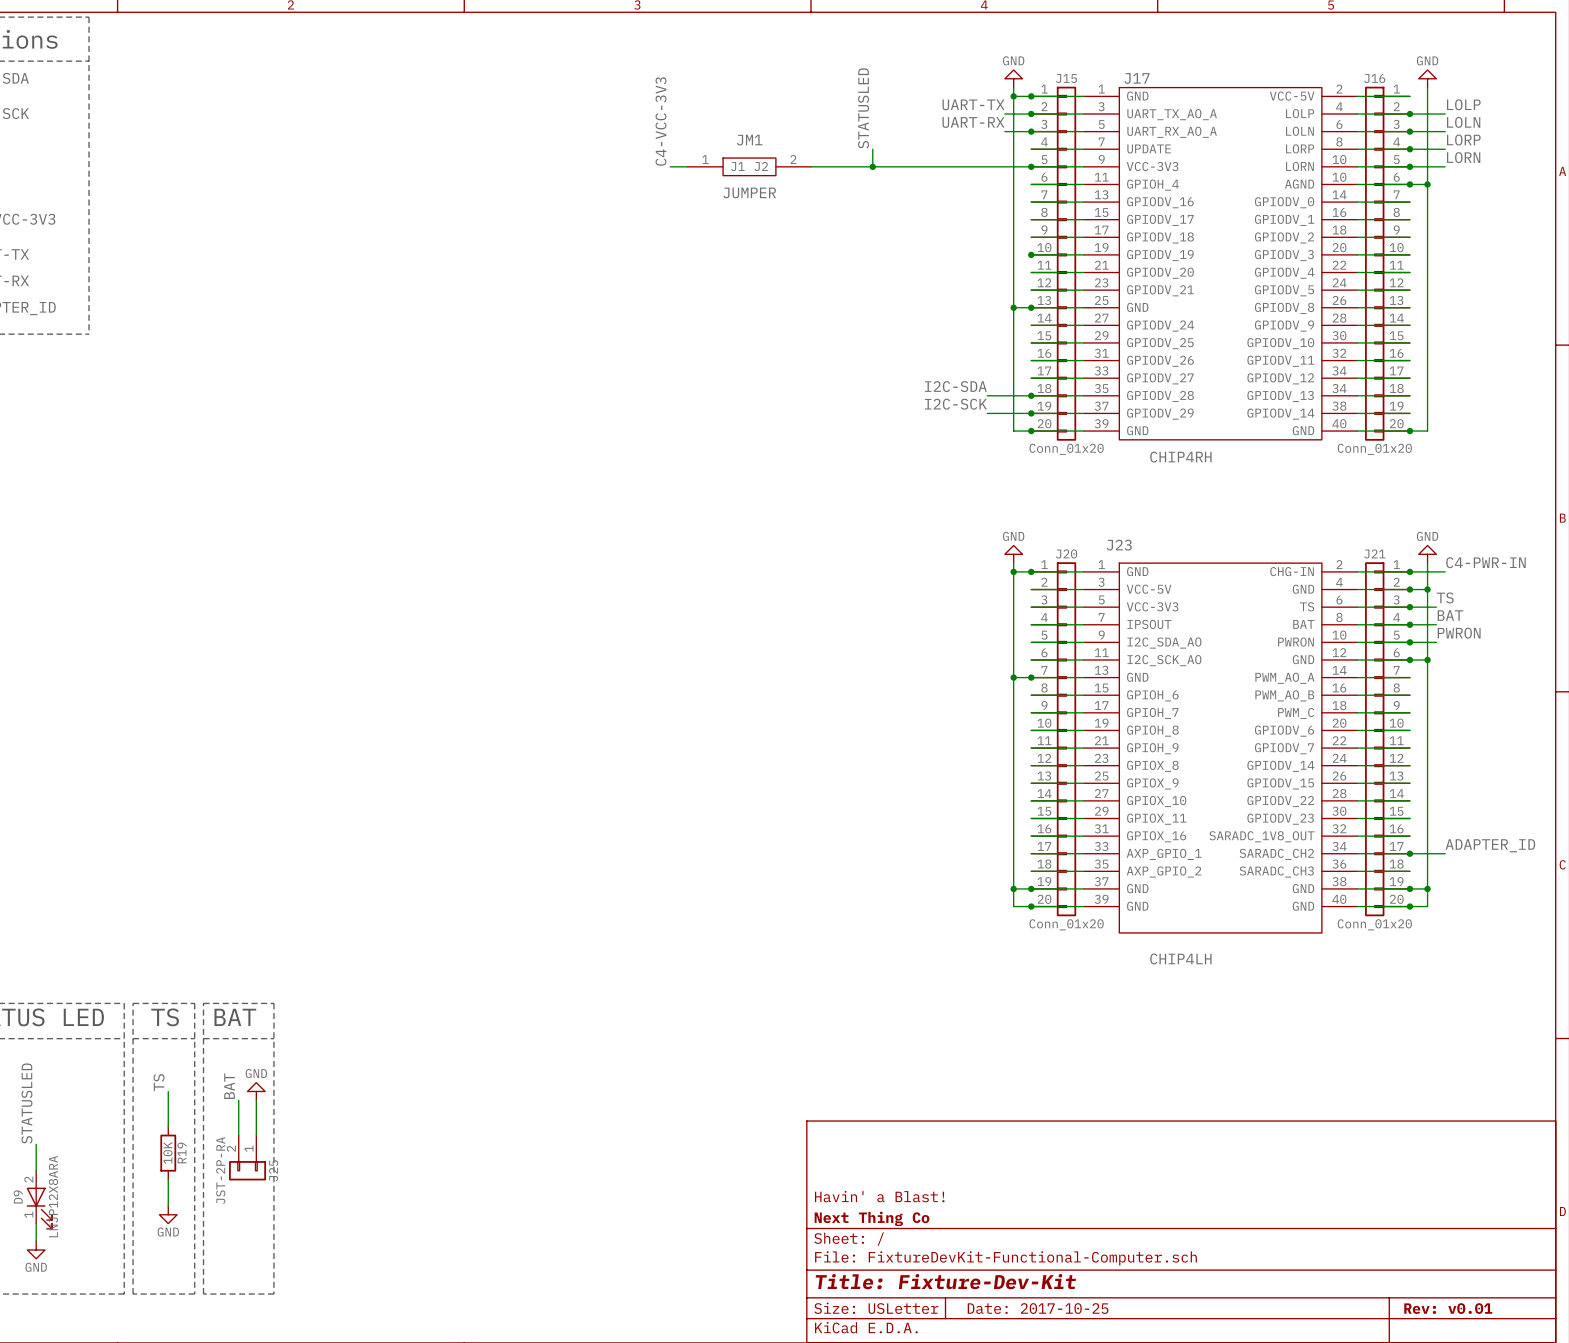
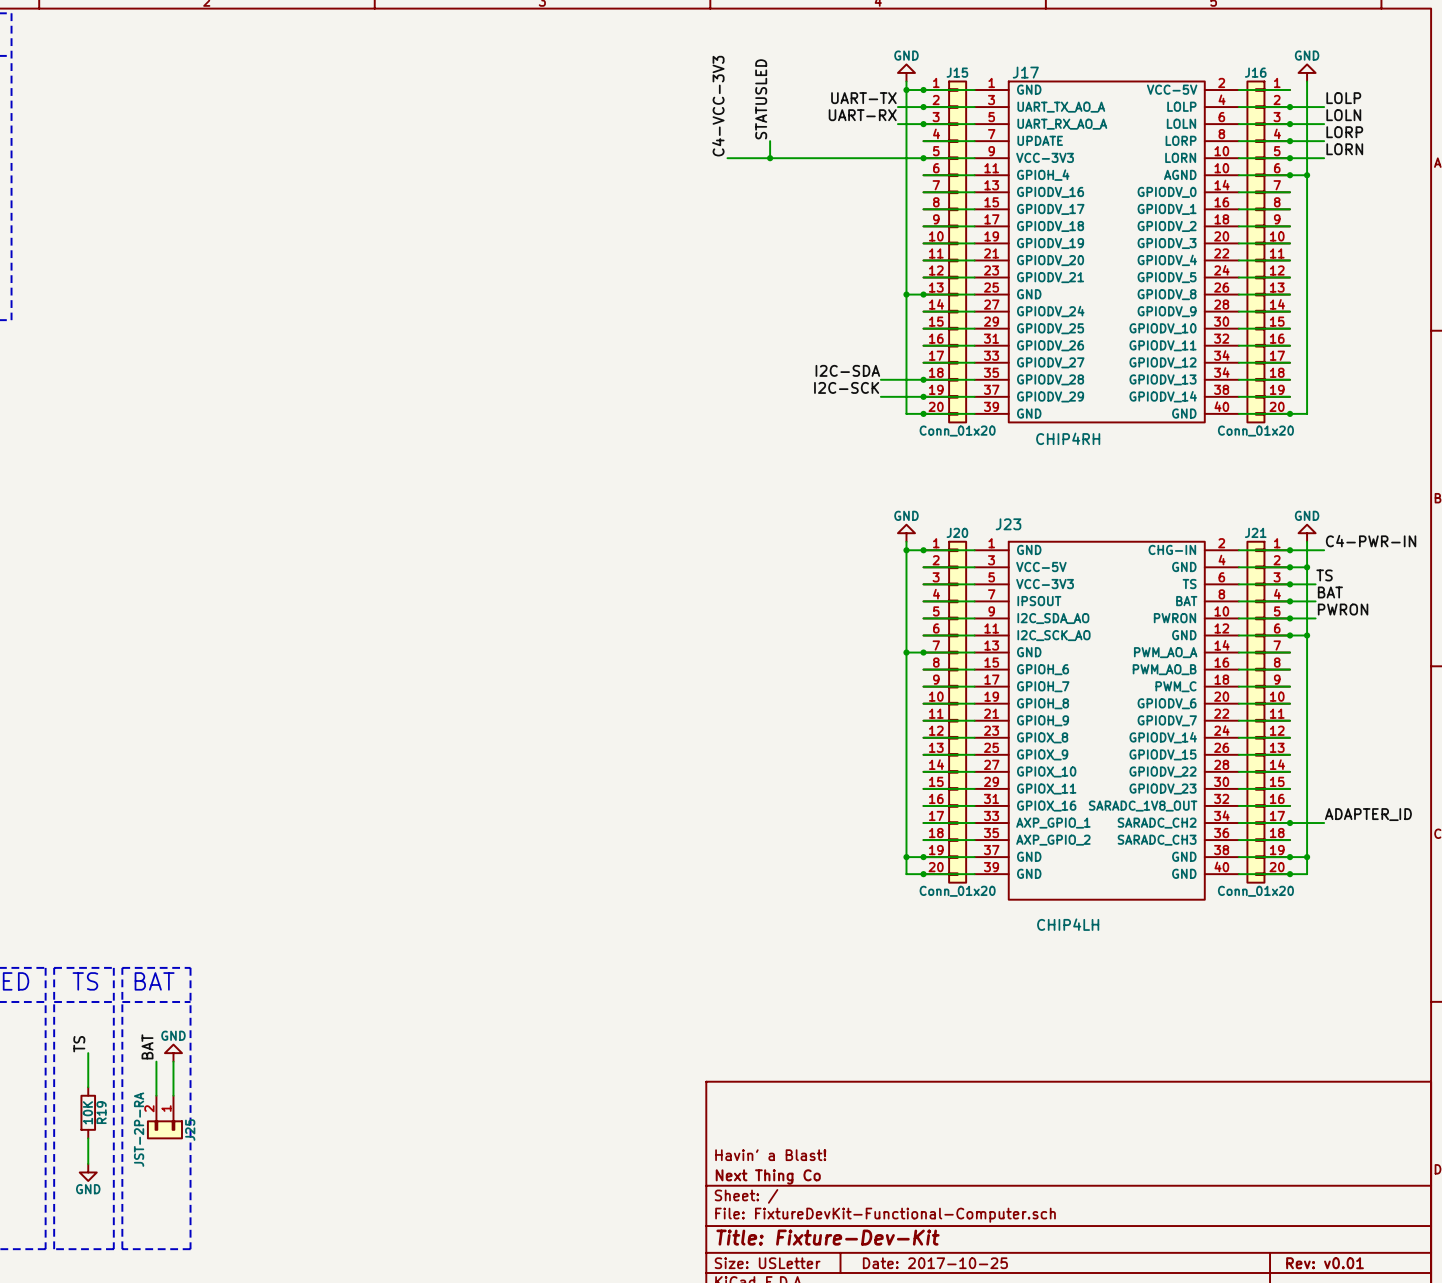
label position: C4-VCC-3V3 (661, 121) -> C4-VCC-3V3 (718, 106)
wire: (670, 166) (687, 166) -> none
JM1: JUMPER (749, 166) -> none
wire: (811, 166) (828, 166) -> none
junction: (1031, 254) -> none

